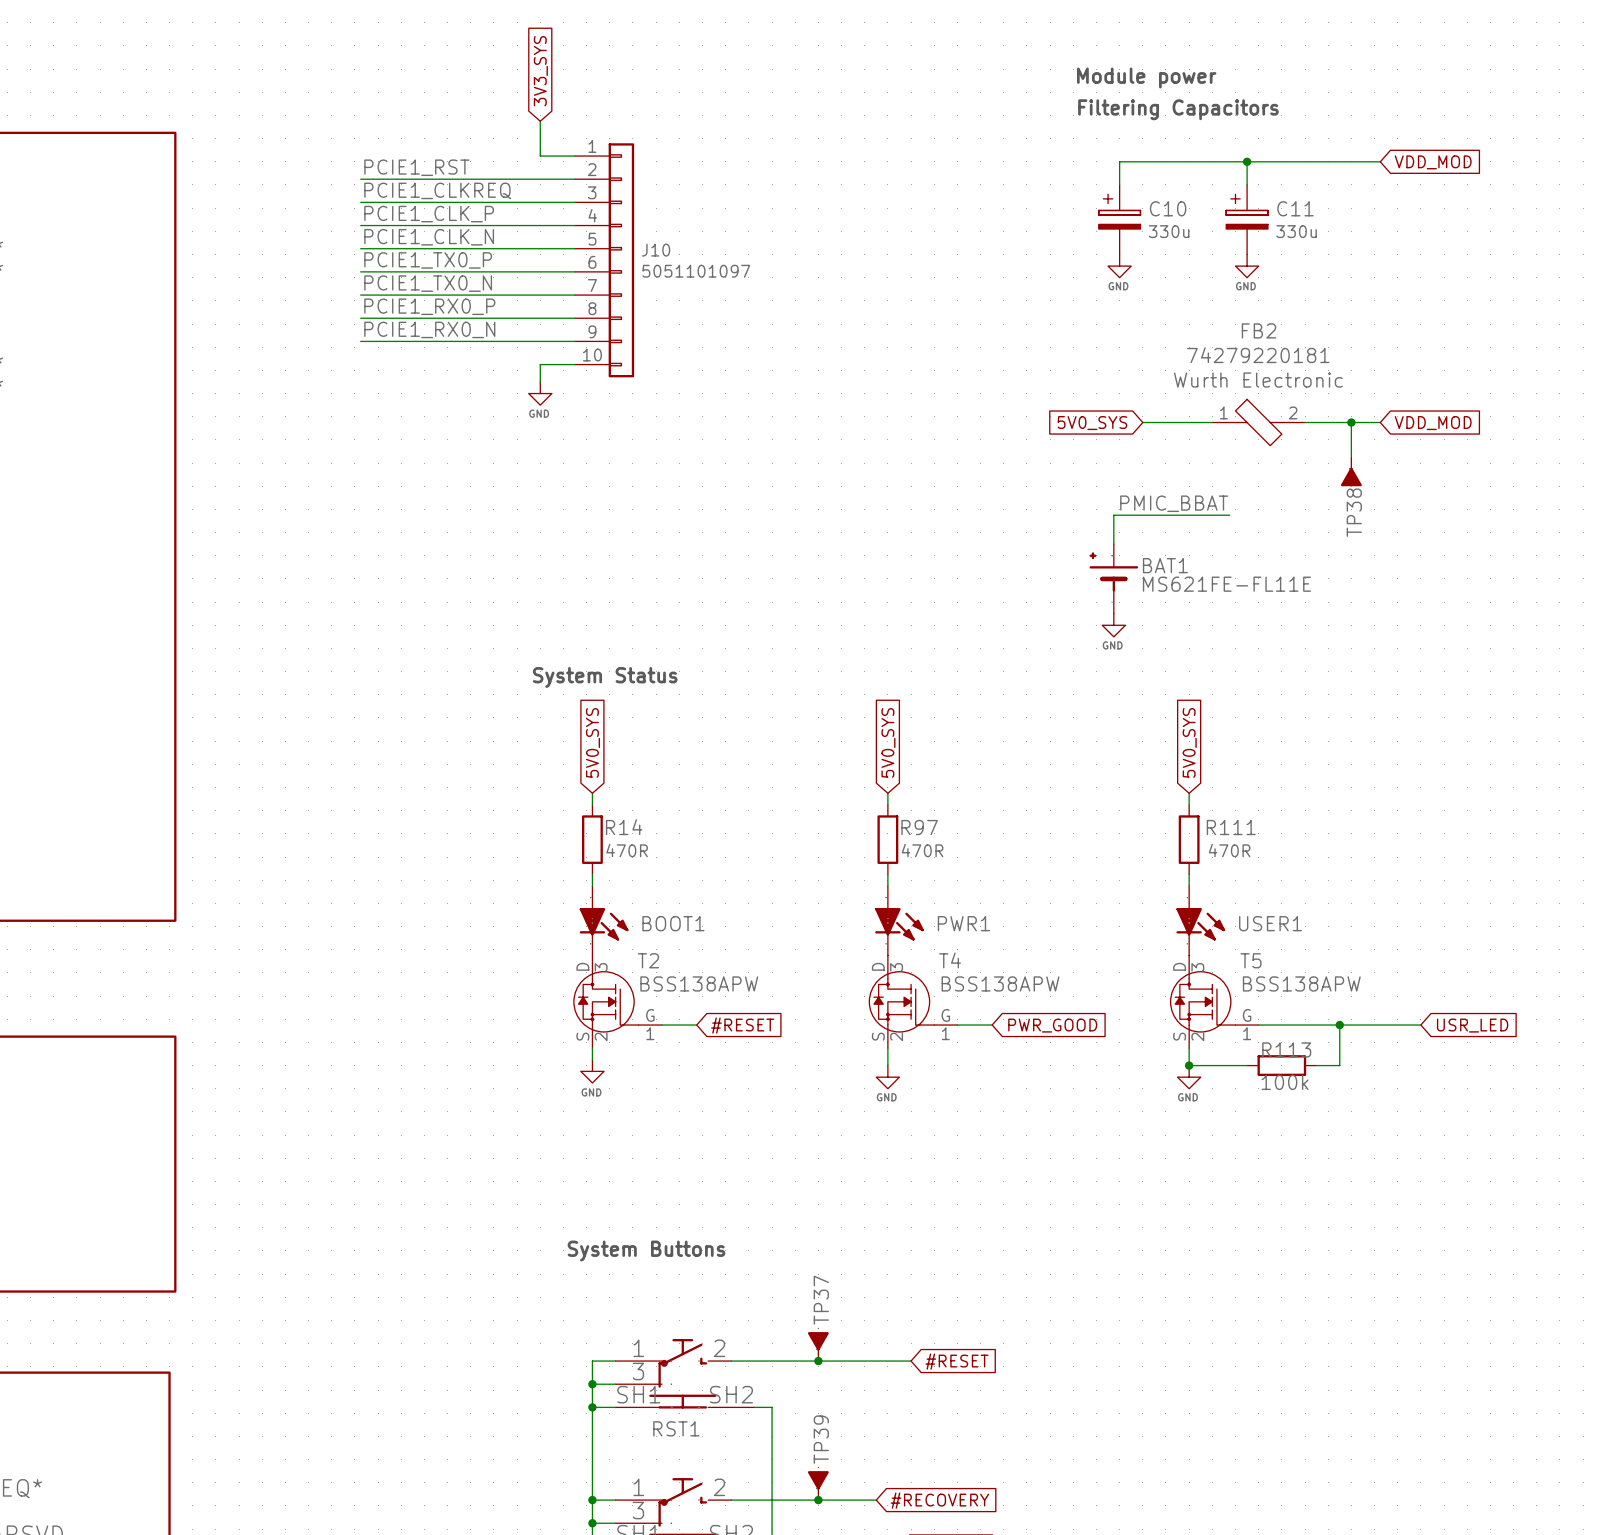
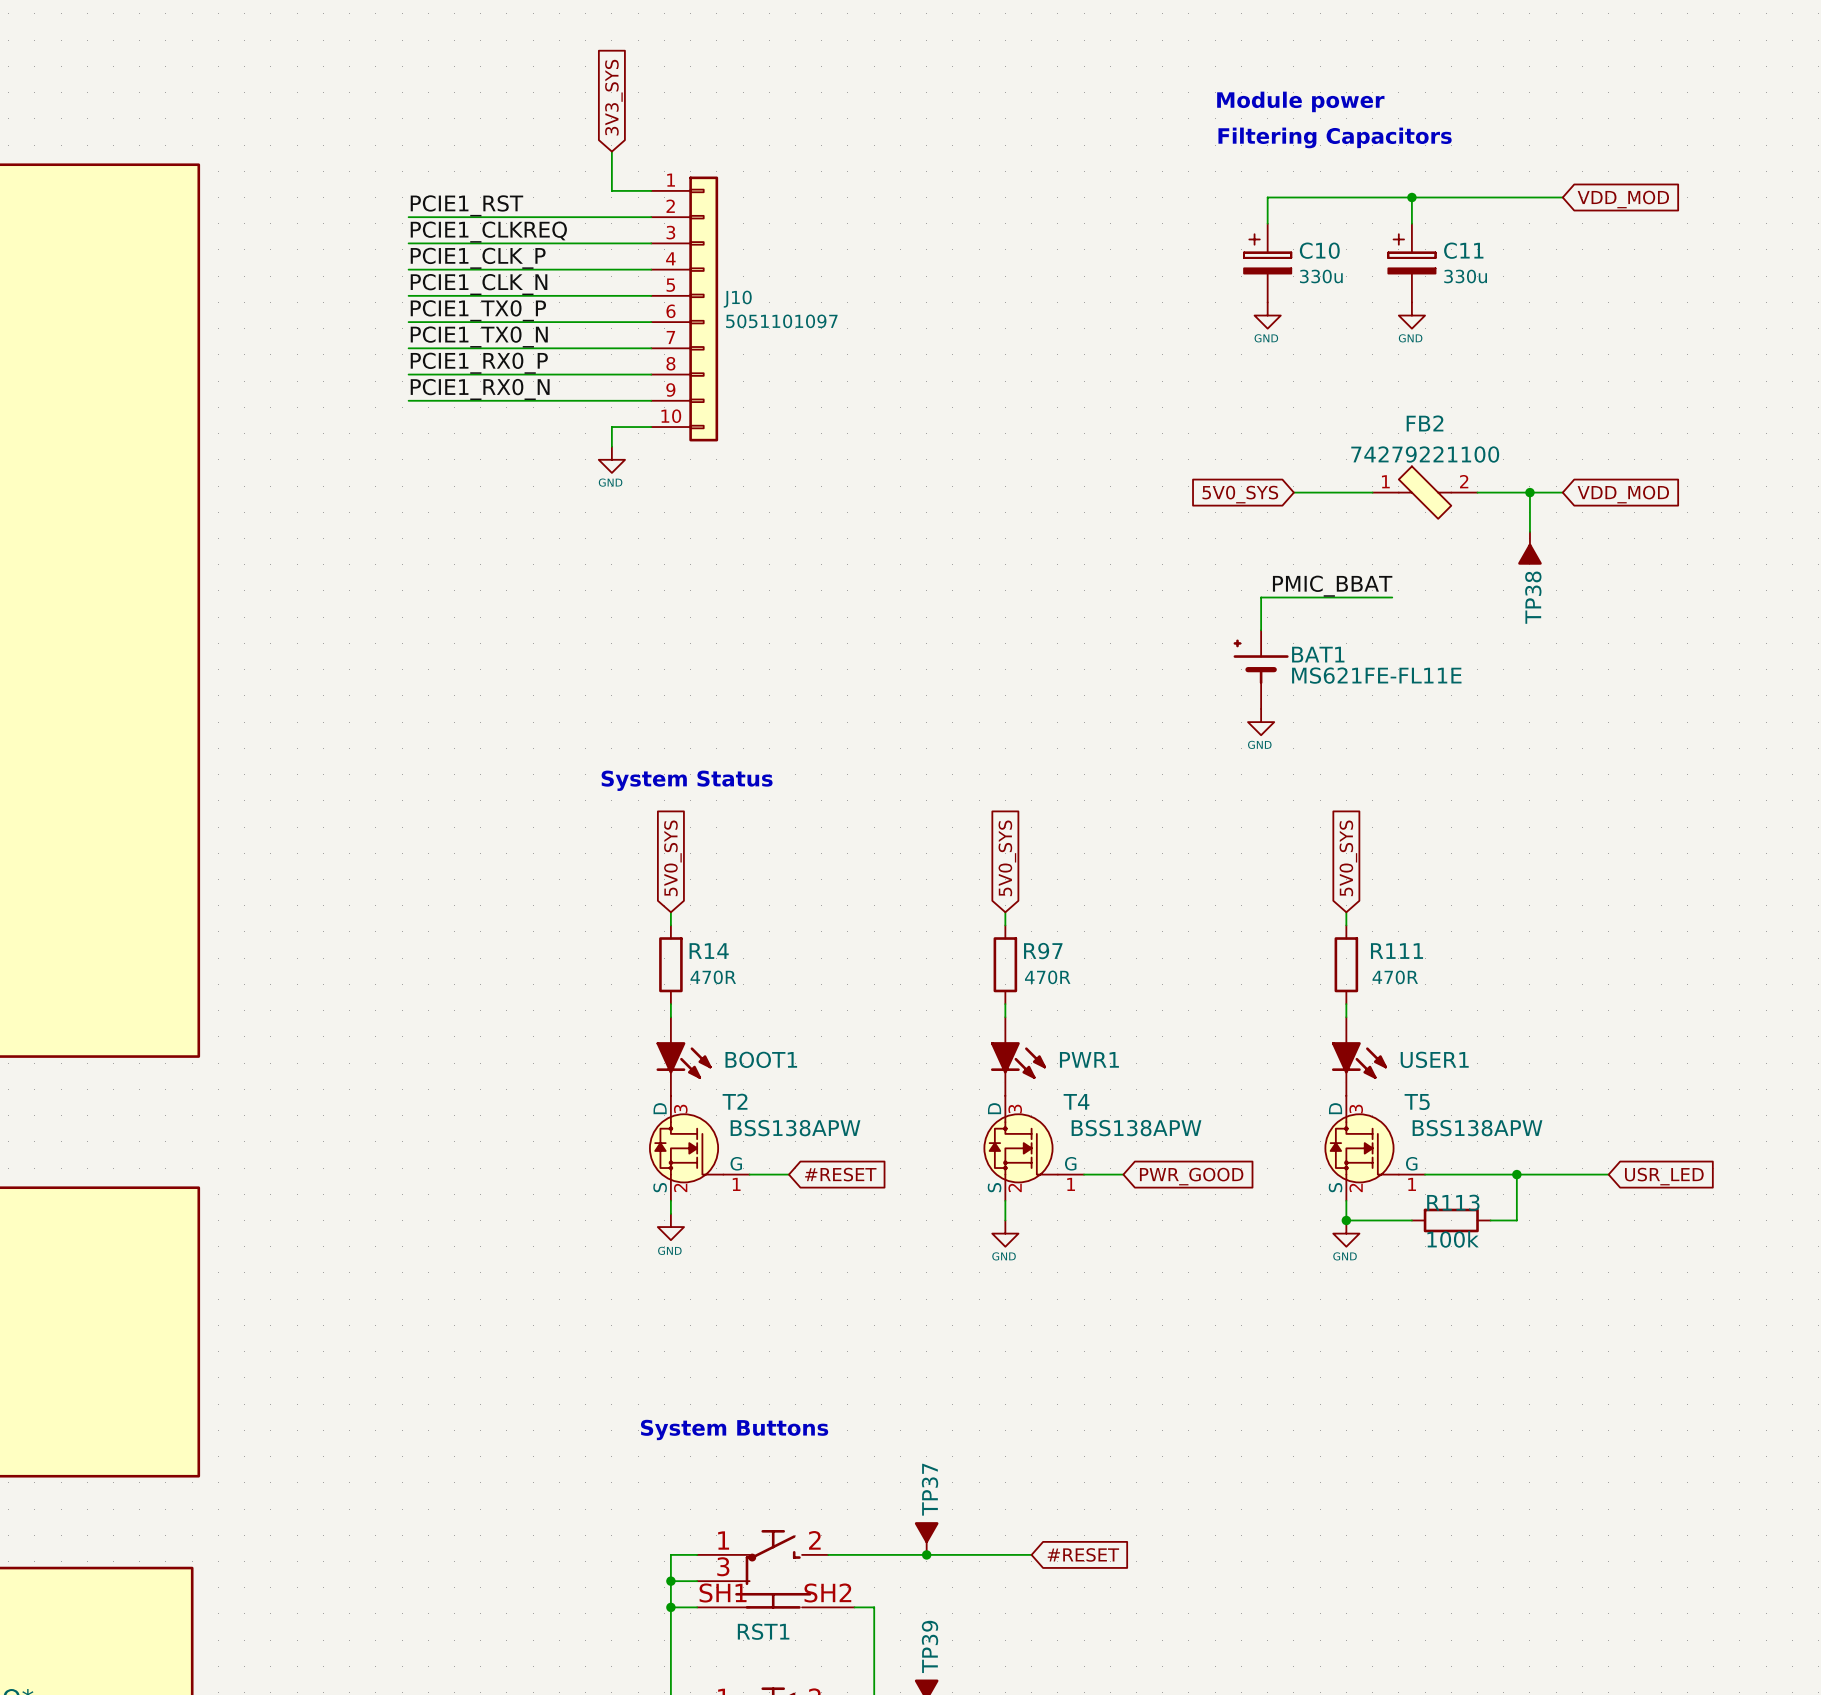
FB2 name position: FB2 (1259, 330) -> FB2 (1425, 423)
FB2 text: 74279220181 (1258, 355) -> none
FB2 text: Wurth Electronic (1258, 380) -> none
FB2 value: none -> 74279221100 (1425, 454)

